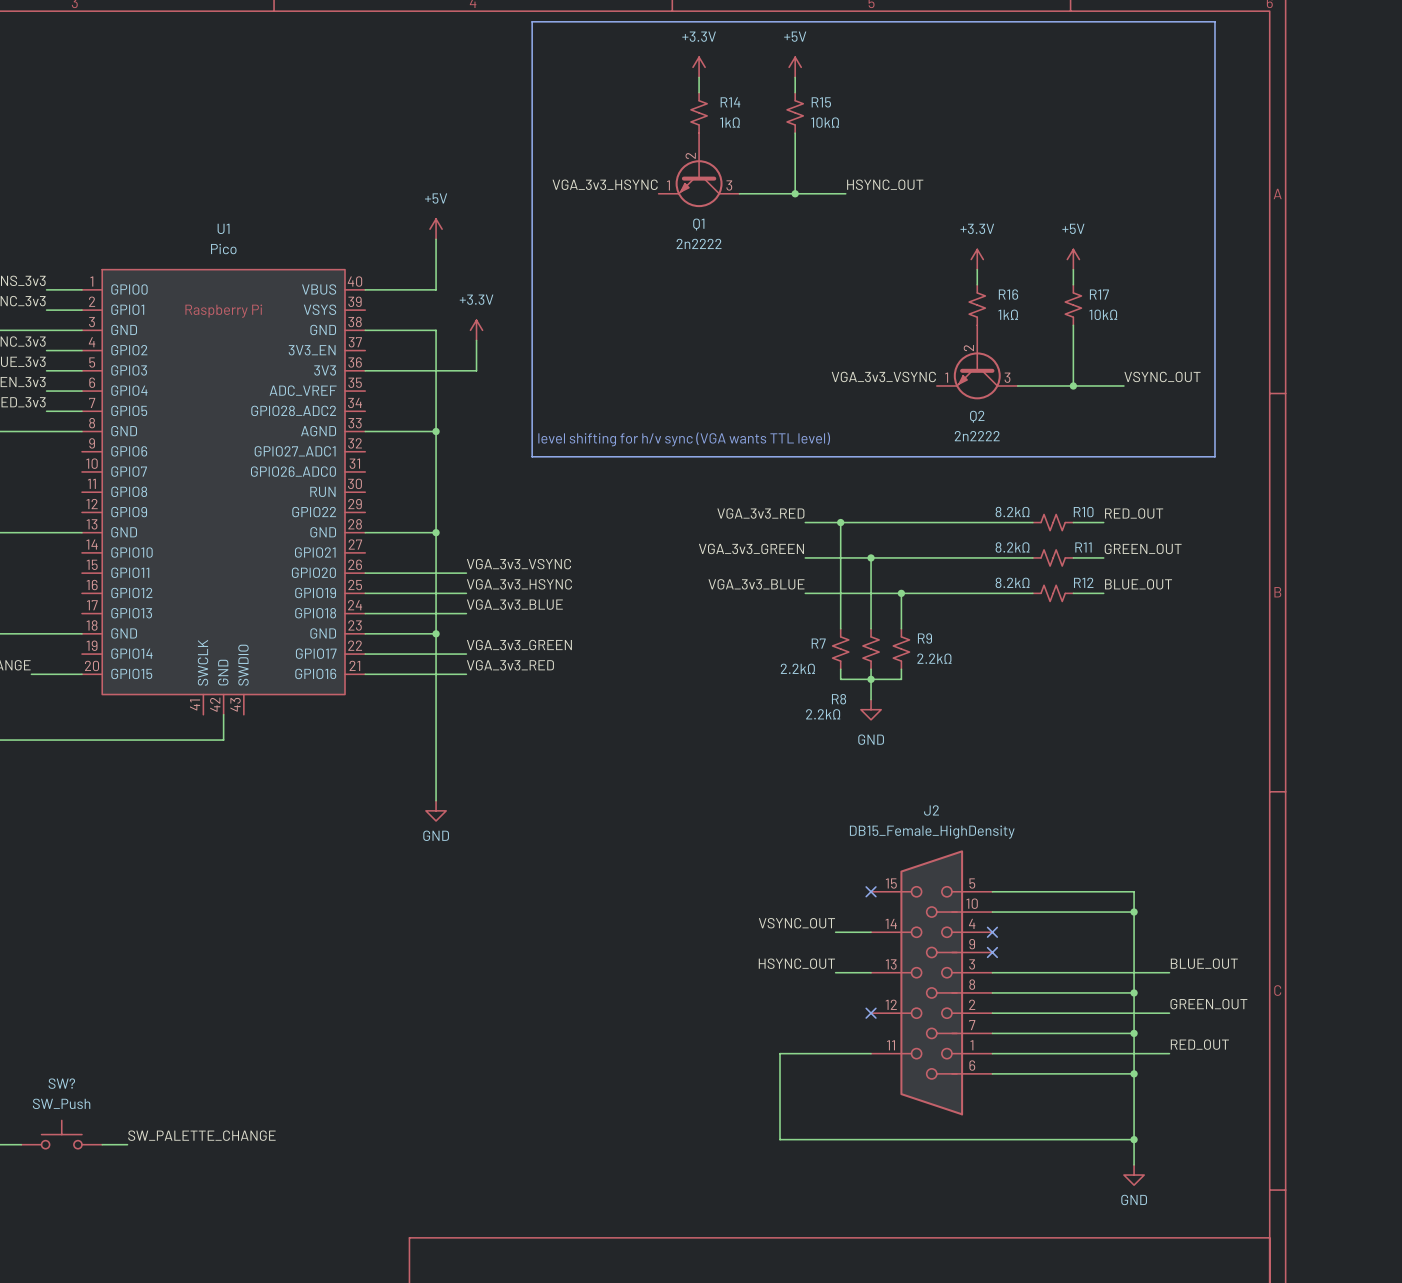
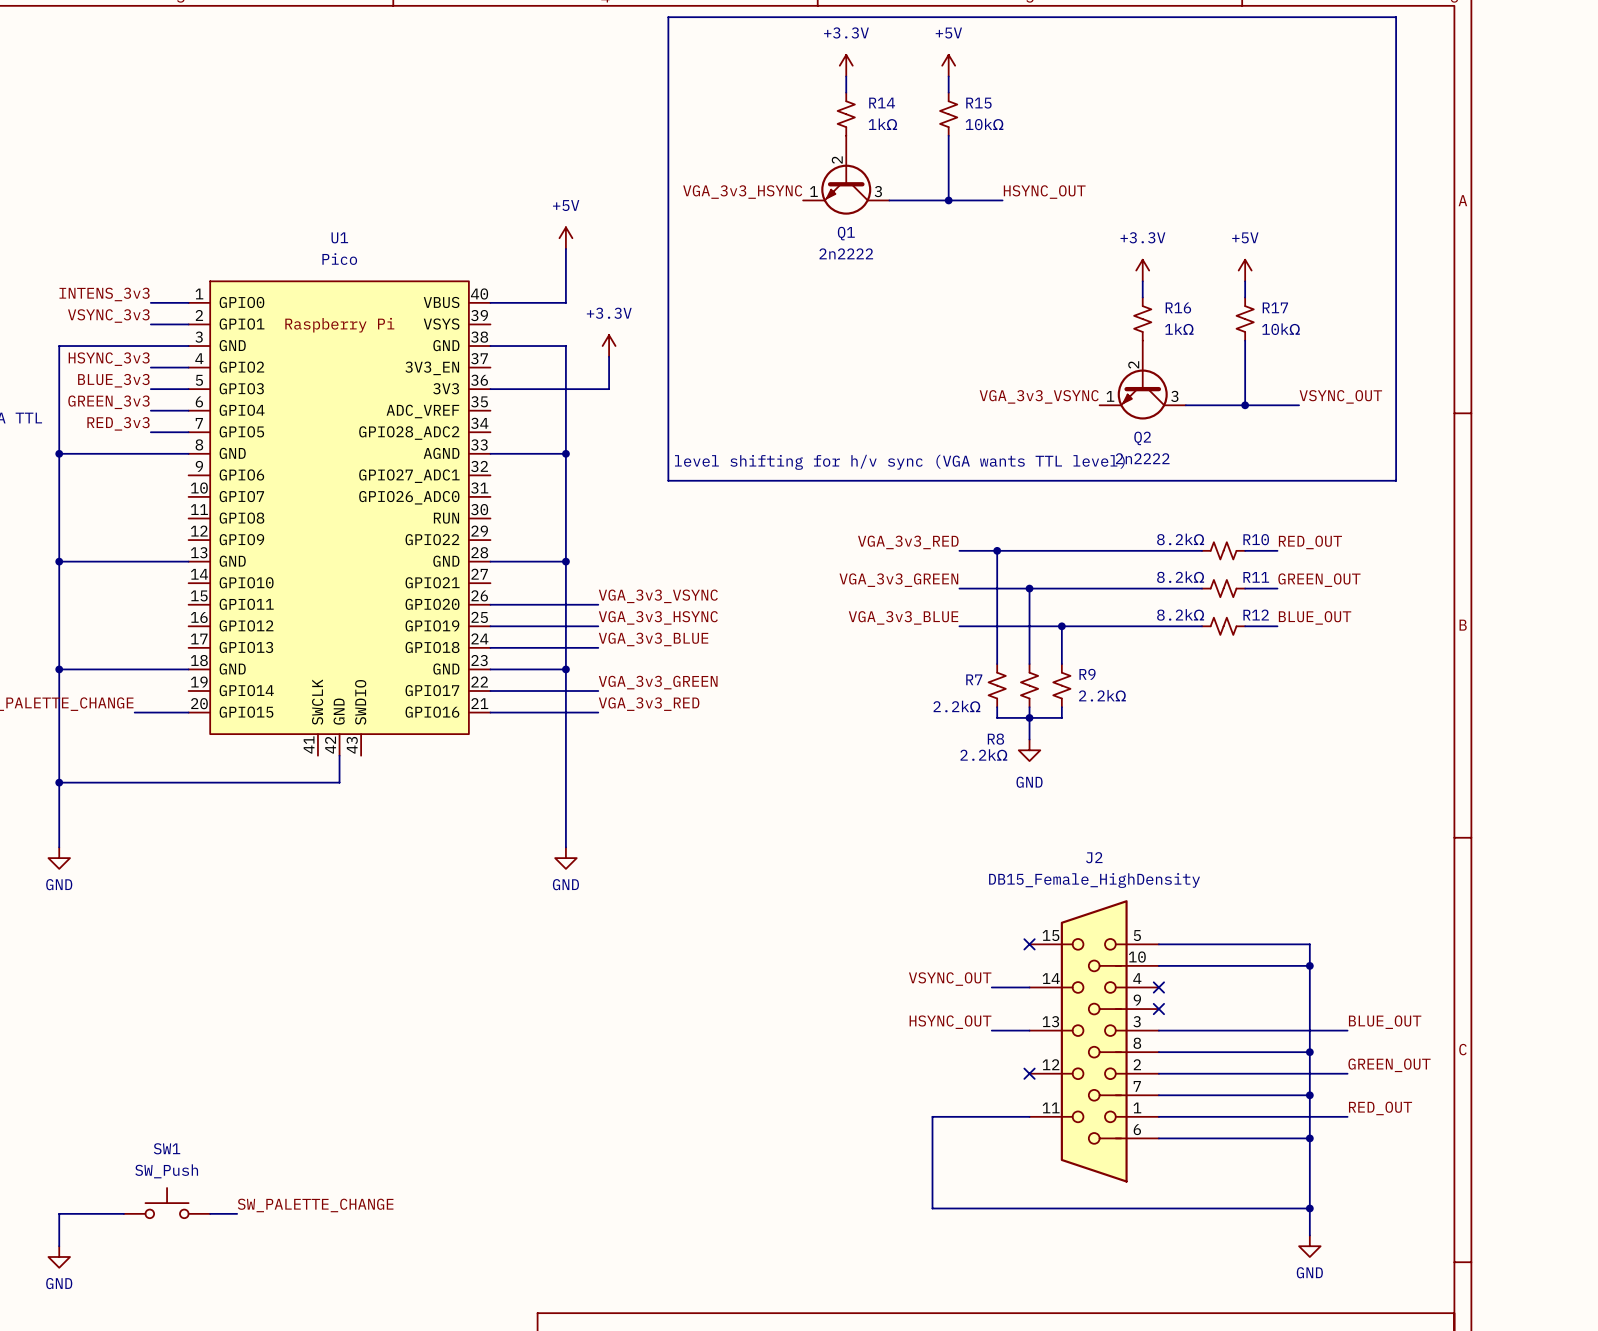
SW? name: SW? (61, 1083) -> SW1 (167, 1148)

